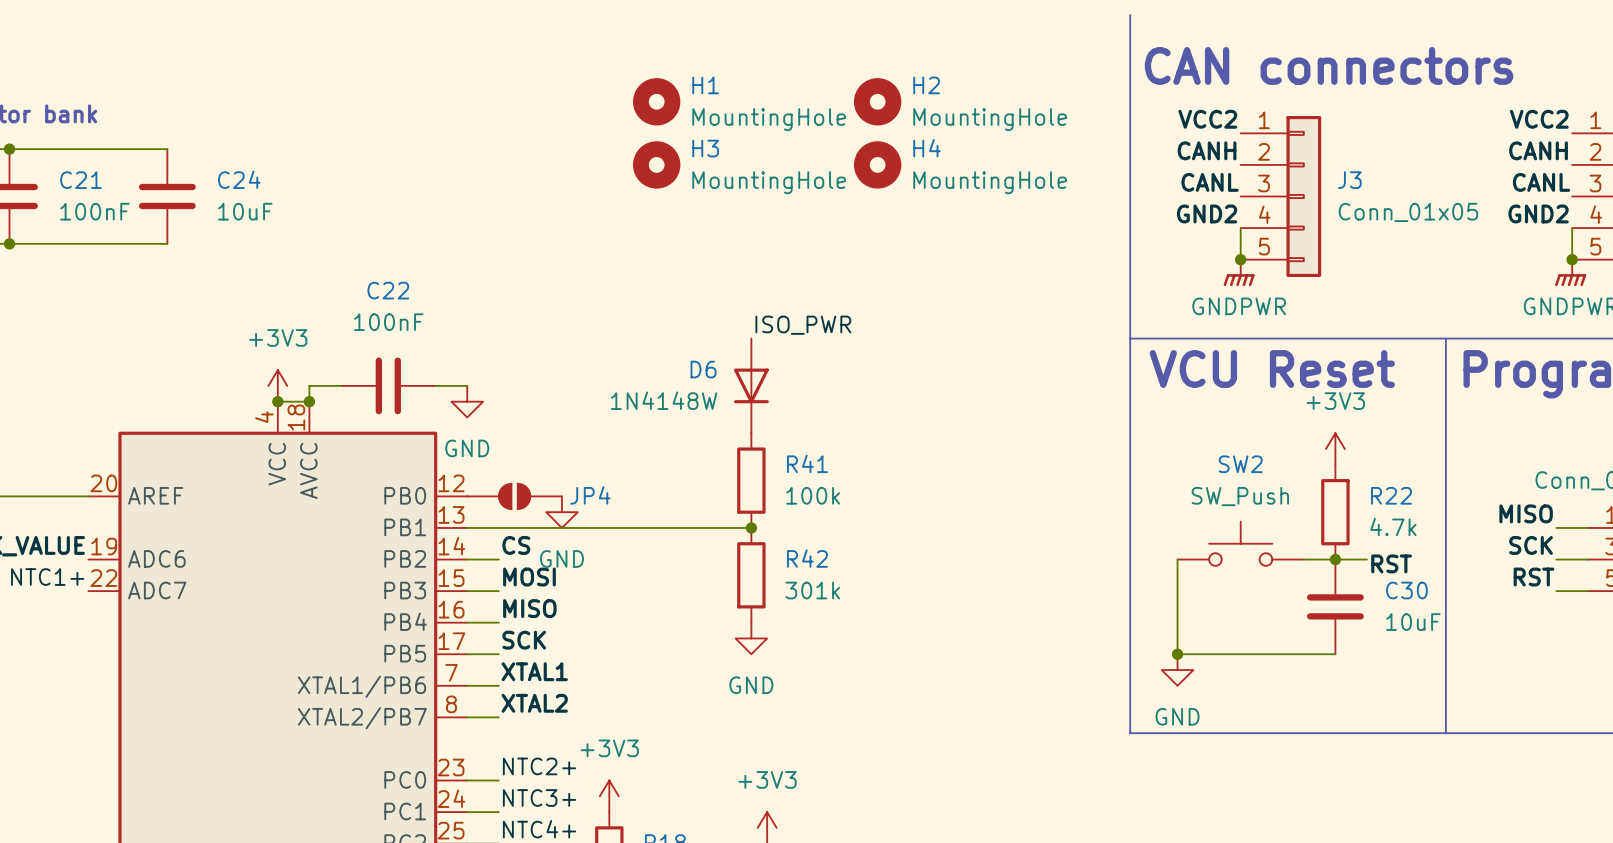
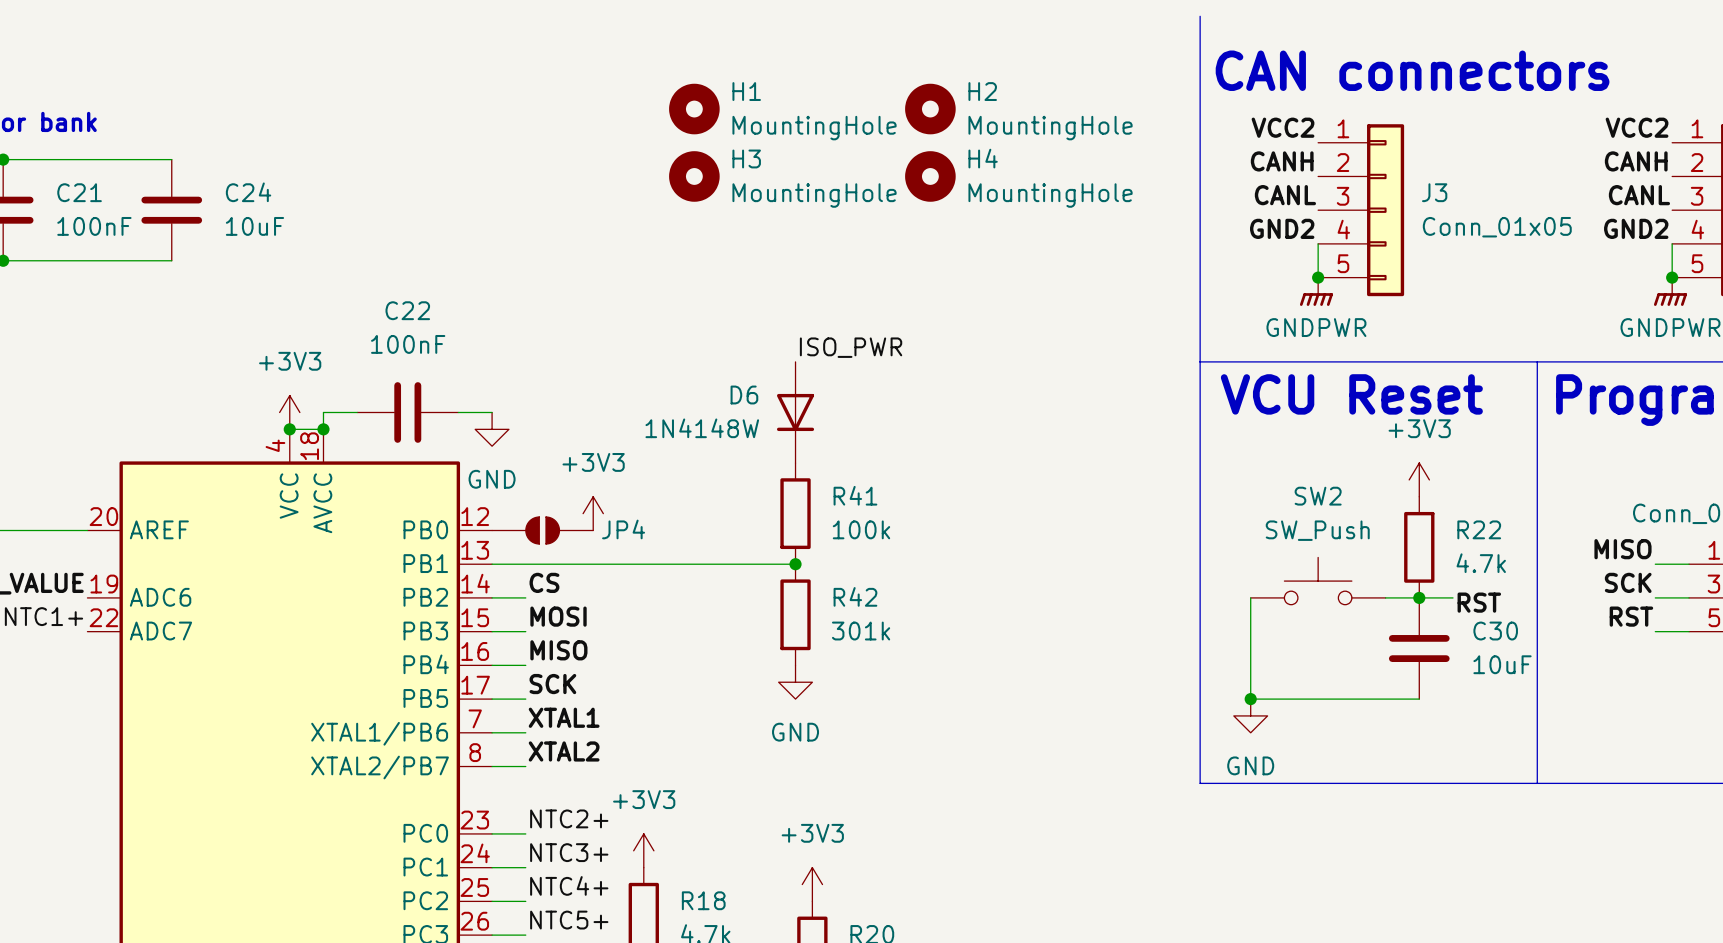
power symbol: none -> +3V3 (593, 513)
power symbol: GND (561, 512) -> none

